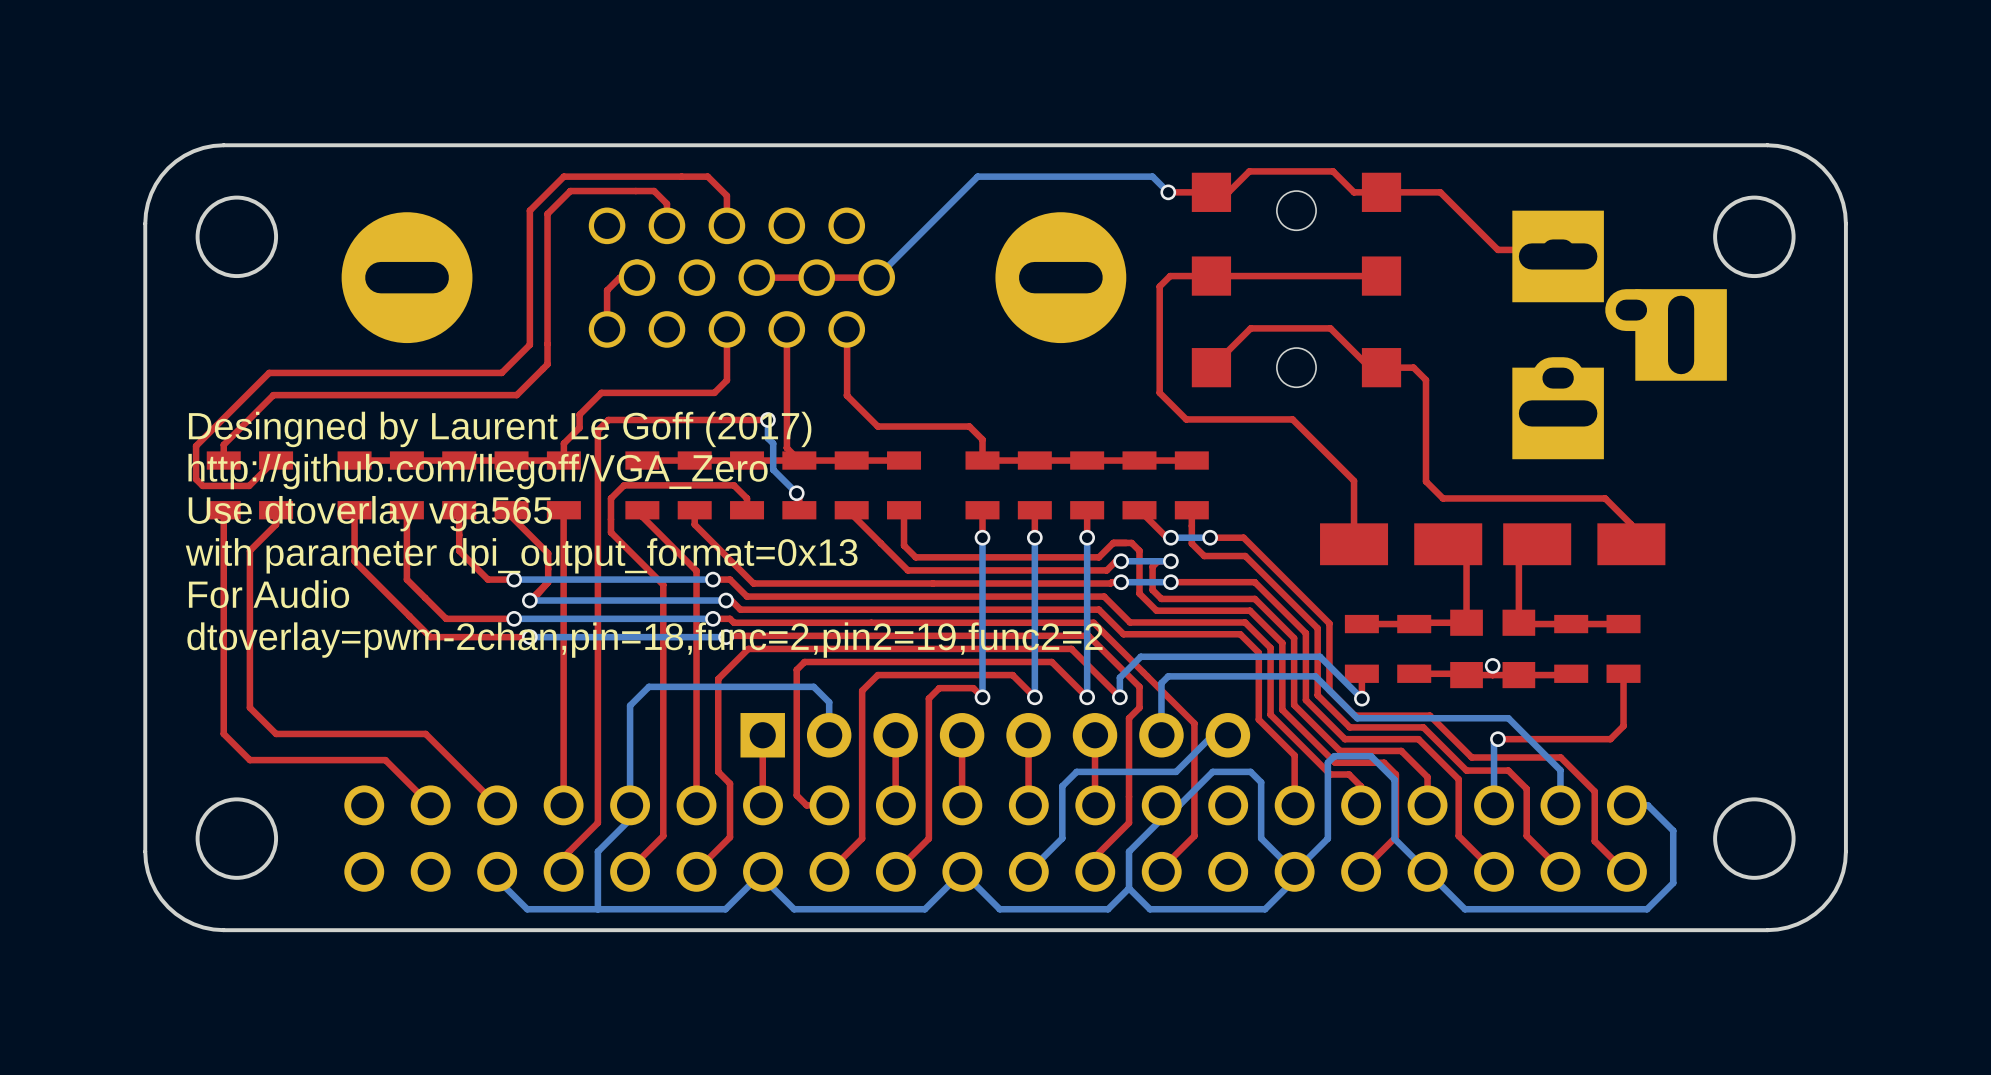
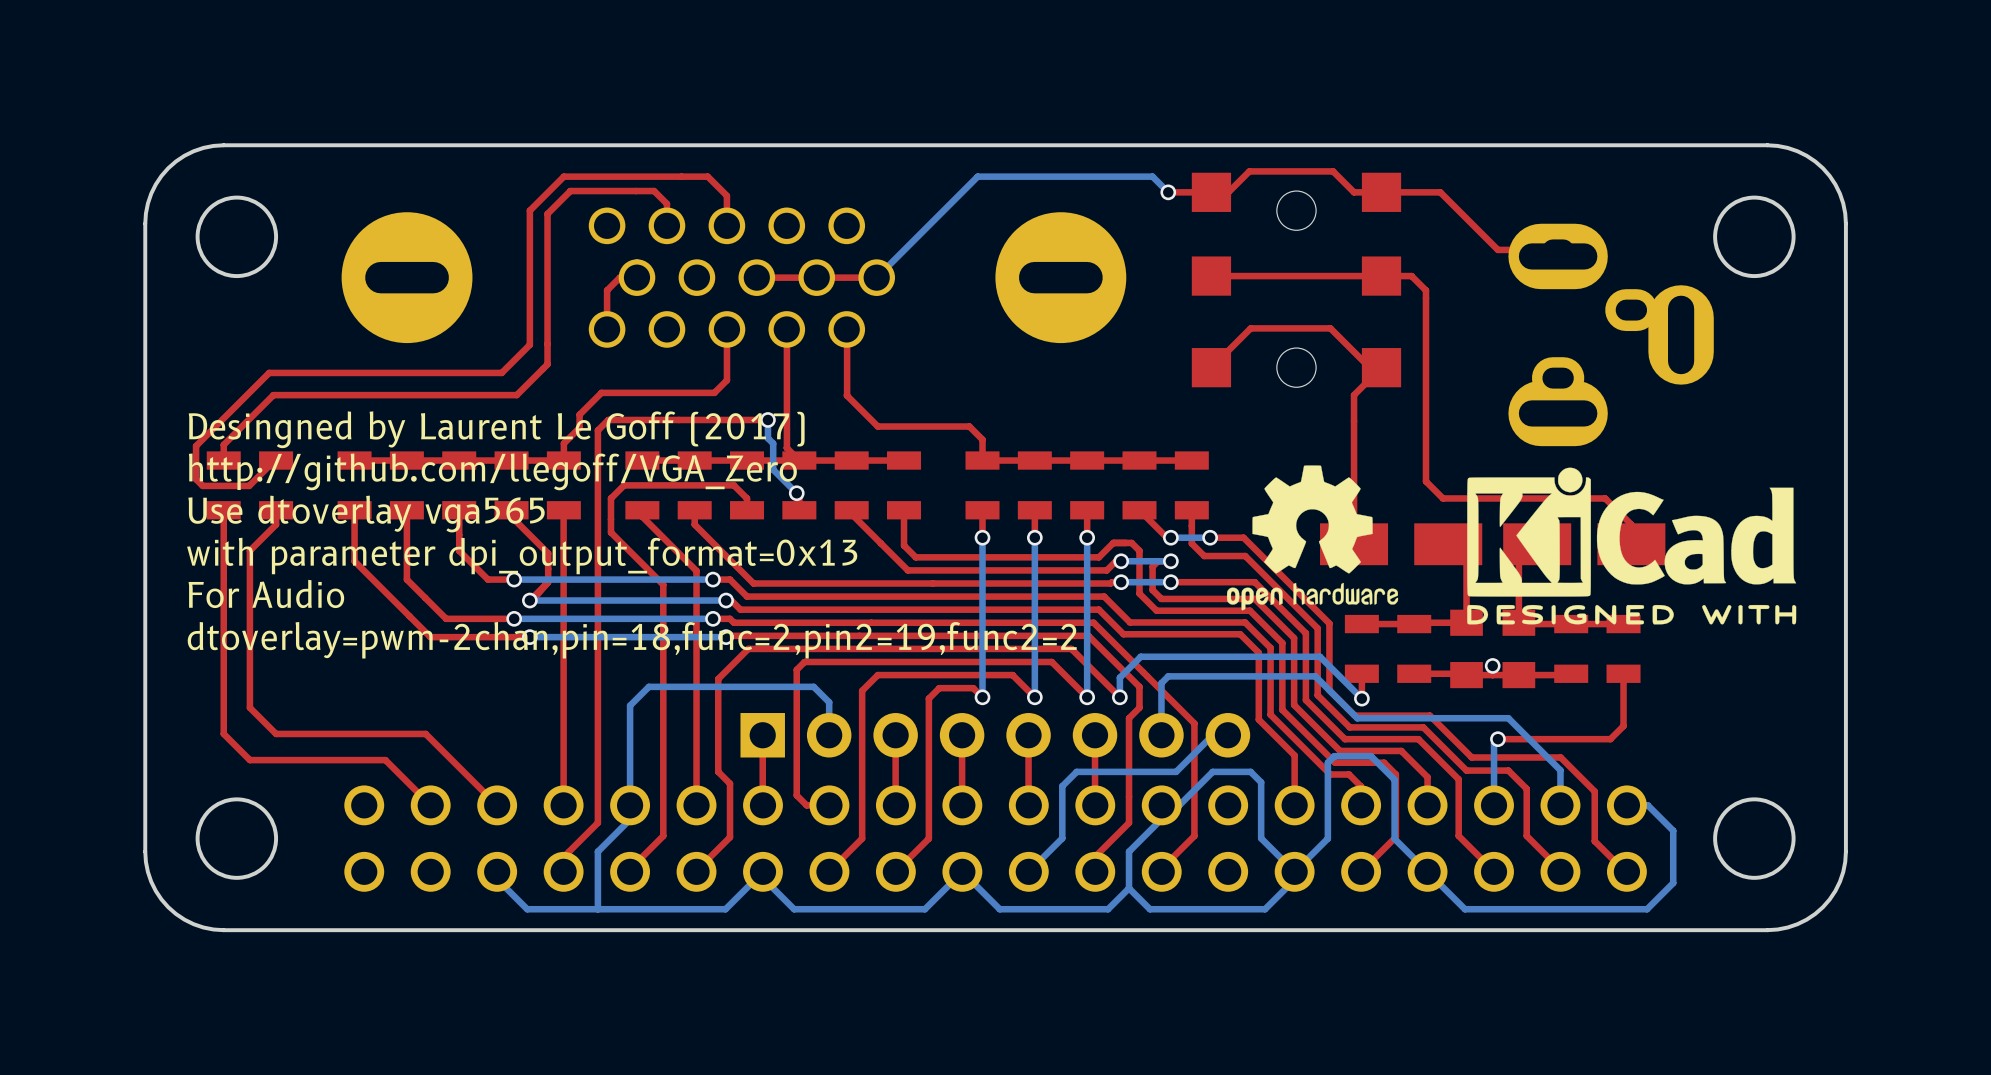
part footprint: [1512, 210, 1727, 460] -> [1508, 223, 1714, 447]
top track: (1211, 276) (1170, 276) (1159, 286) (1159, 392) (1186, 419) (1292, 419) (1354, 480) -> (1381, 367) (1354, 395) (1354, 480)
top track: (1393, 367) (1413, 367) (1425, 380) -> (1381, 276) (1411, 276) (1425, 290) (1425, 380)
drawing: none -> [1226, 465, 1399, 611]
drawing: none -> [1467, 467, 1797, 625]

